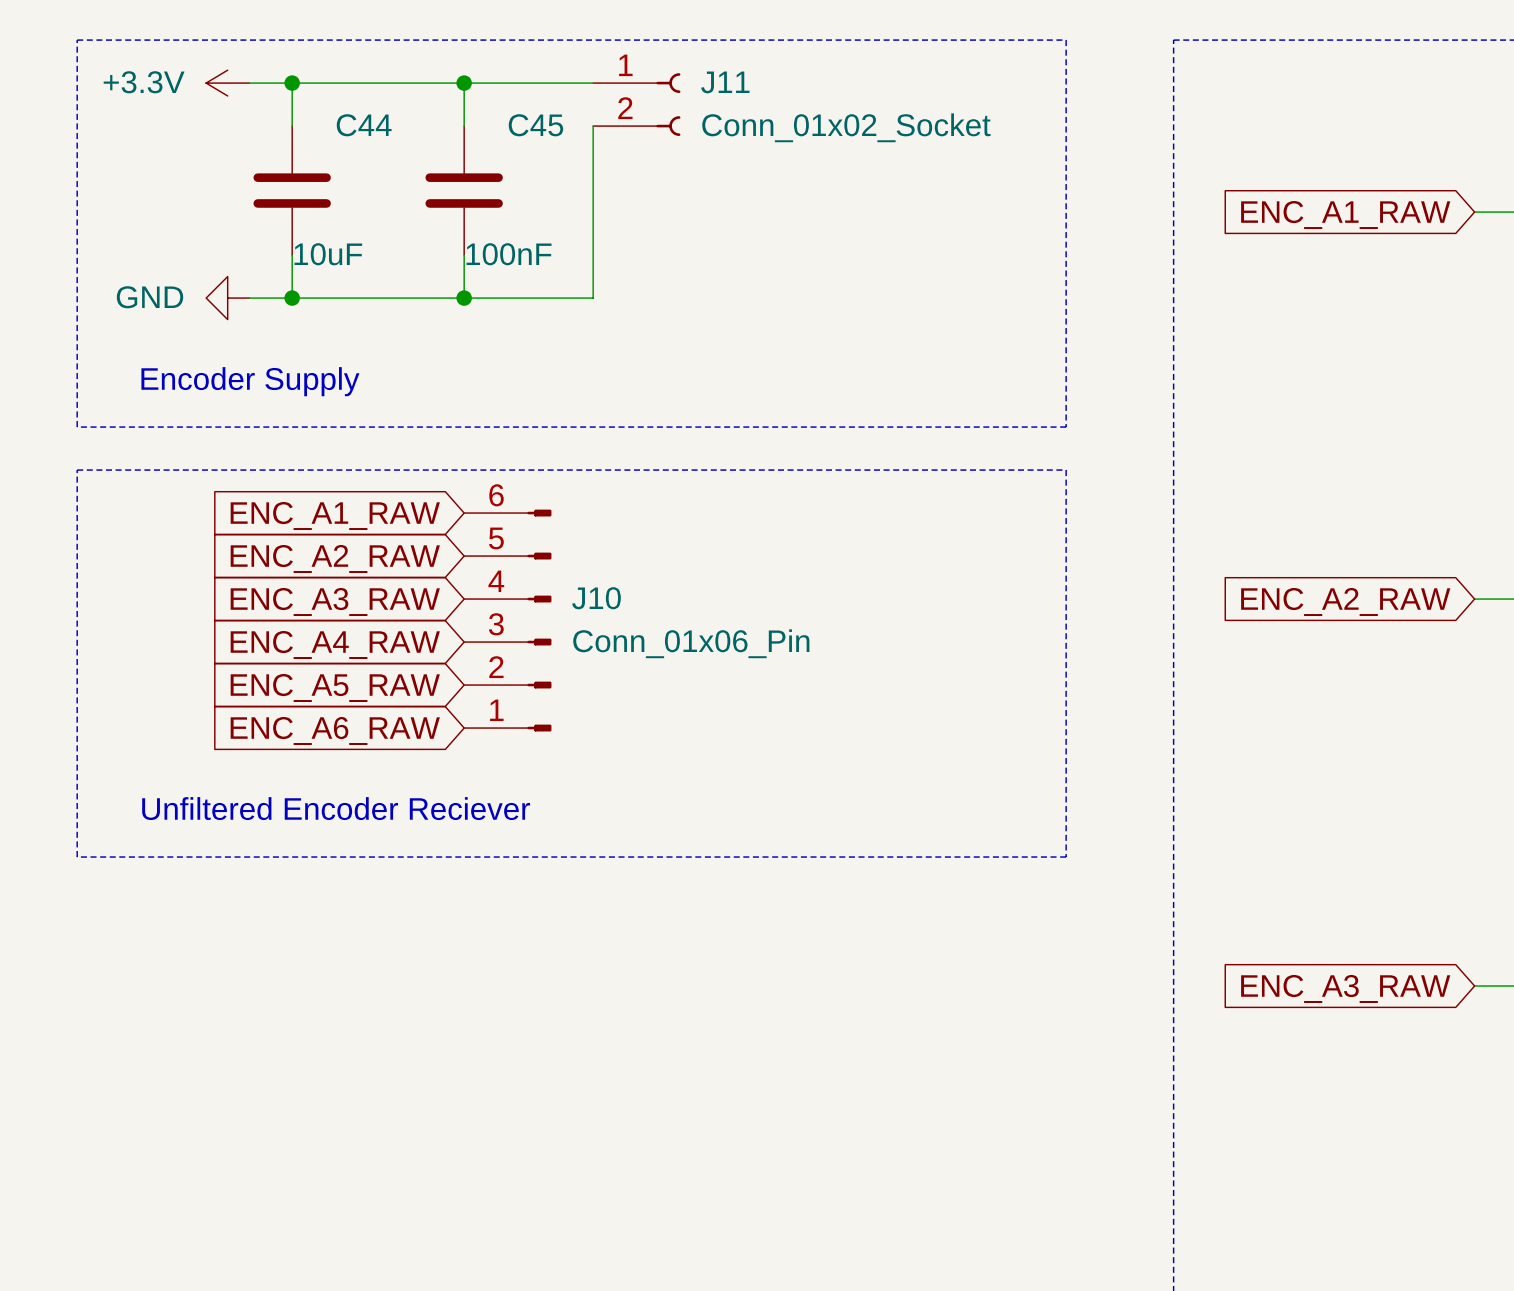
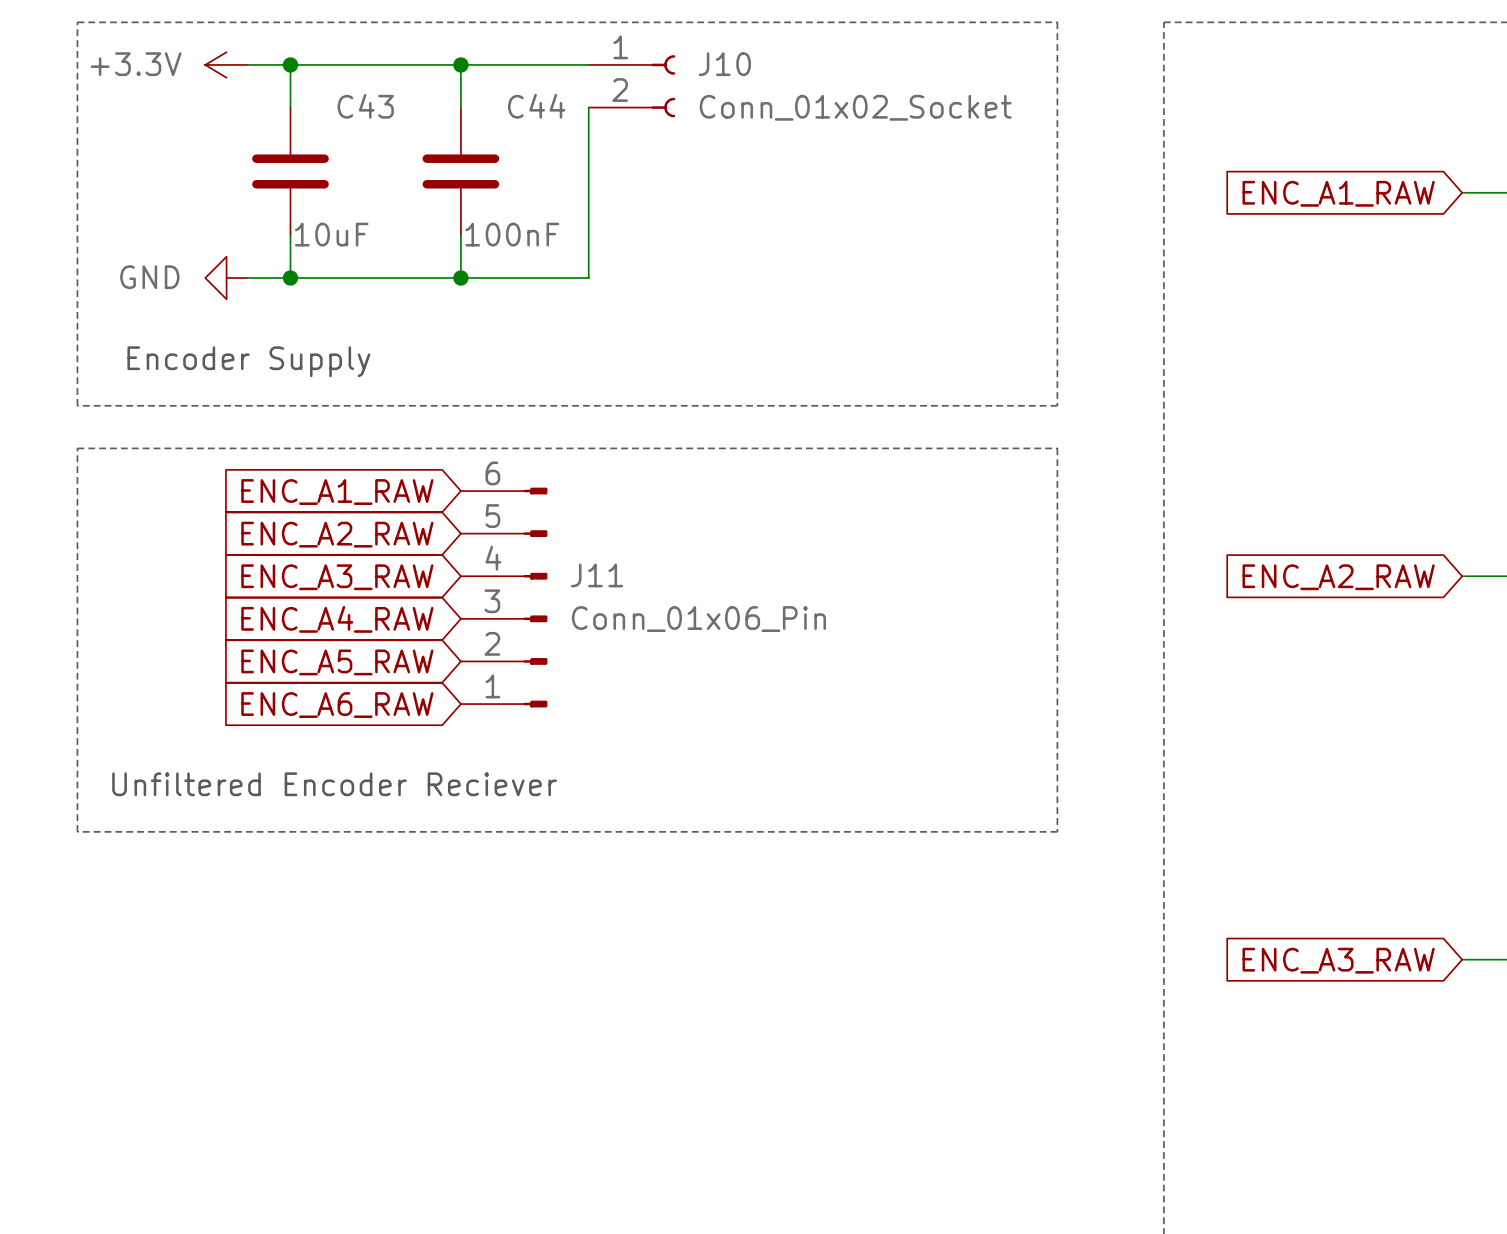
J11 name: J11 (725, 82) -> J10 (724, 64)
C44 name: C44 (364, 125) -> C43 (365, 106)
C45 name: C45 (535, 125) -> C44 (536, 106)
J10 name: J10 (596, 598) -> J11 (597, 575)

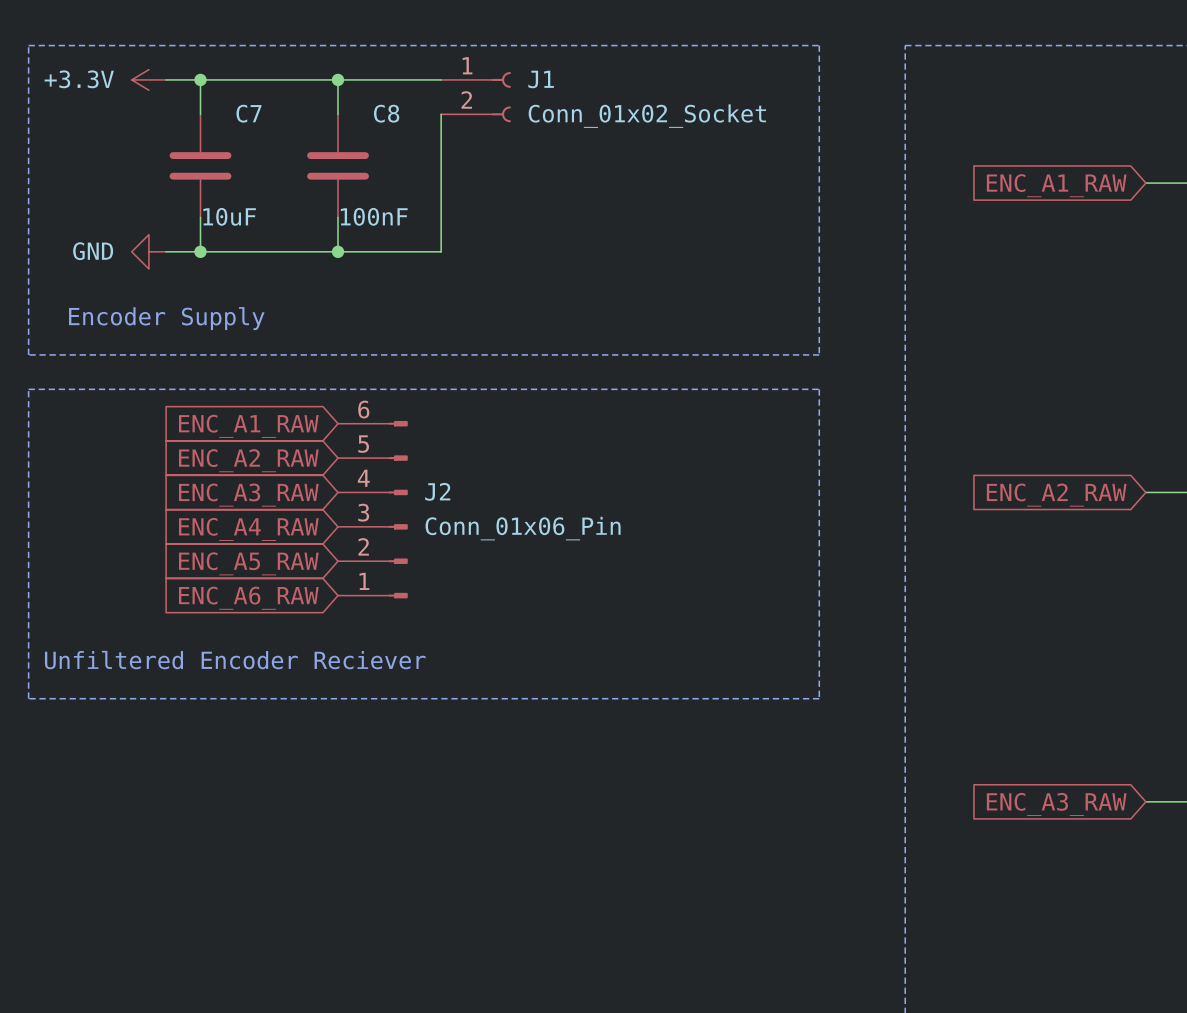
J10 name: J10 (724, 64) -> J1 (541, 79)
C43 name: C43 (365, 106) -> C7 (248, 113)
C44 name: C44 (536, 106) -> C8 (386, 113)
J11 name: J11 (597, 575) -> J2 (437, 491)

